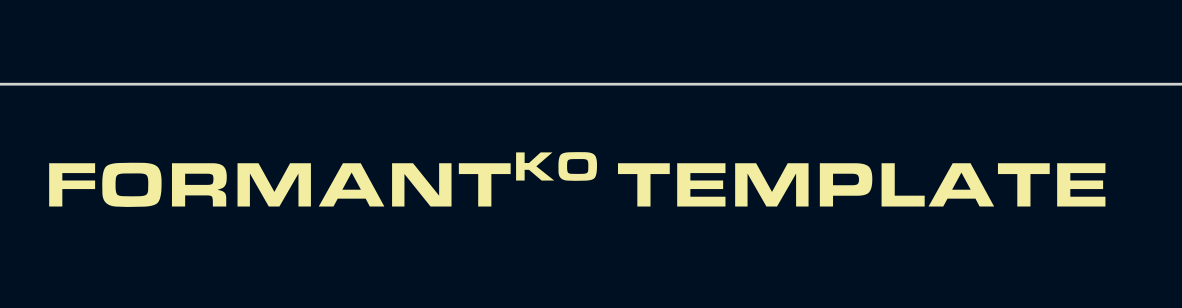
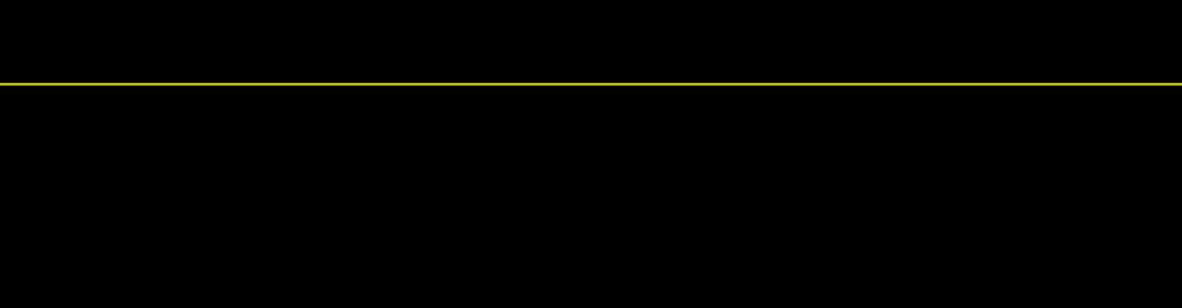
drawing: [49, 152, 1106, 207] -> none

